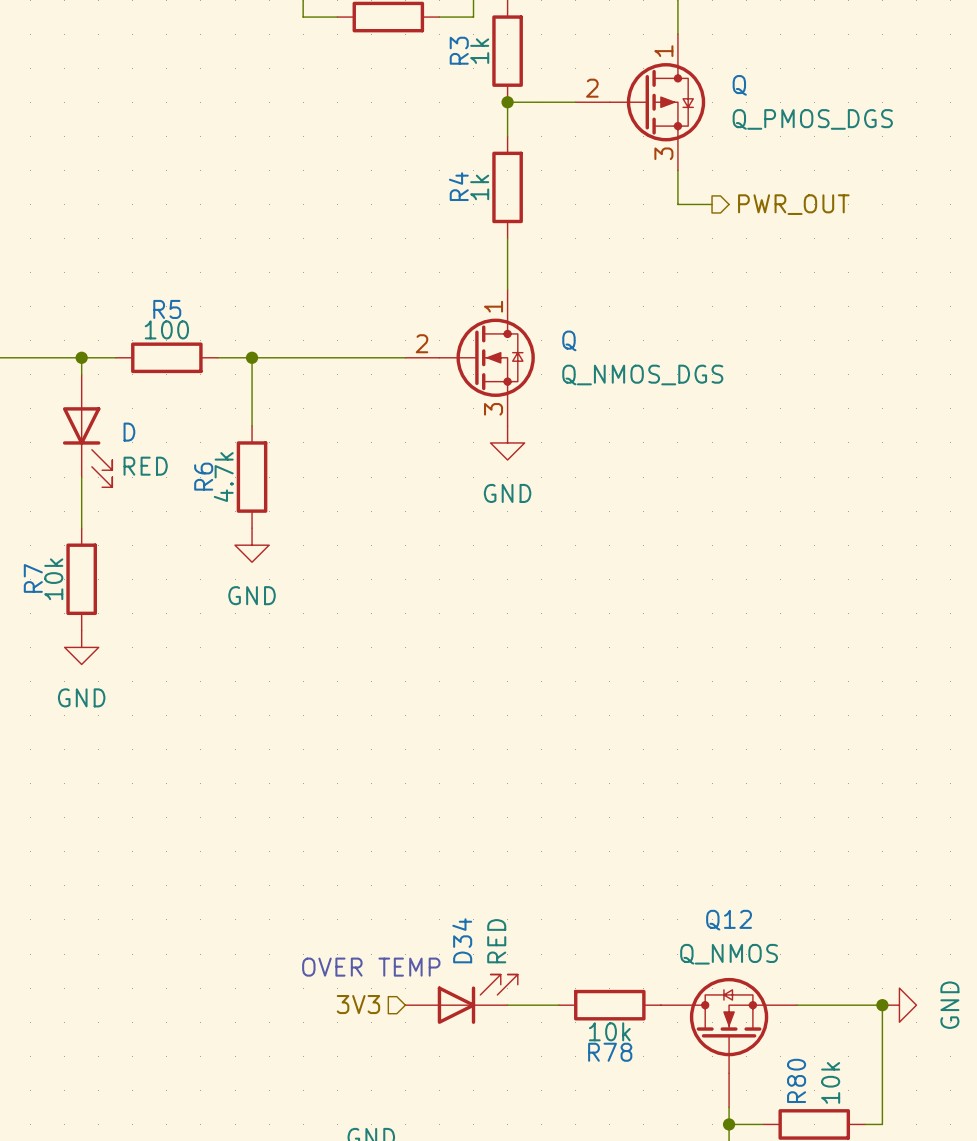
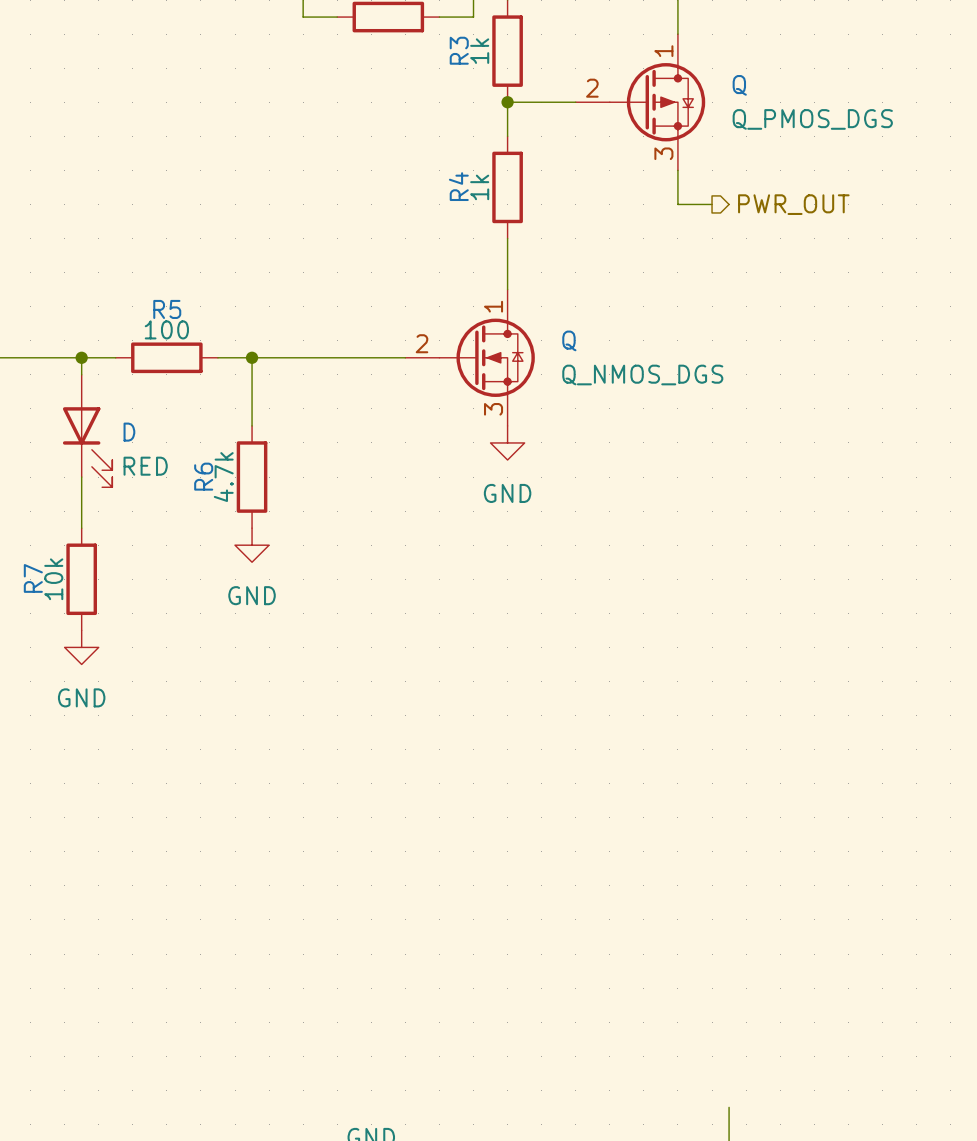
text: OVER TEMP (371, 967) -> none
D34: RED (461, 999) -> none
hierarchical label: 3V3 (358, 1004) -> none
wire: (507, 1005) (558, 1005) -> none
R78: 10k (609, 1005) -> none
wire: (797, 1005) (882, 1005) (882, 1124) (865, 1124) -> none
junction: (882, 1005) -> none
power symbol: GND (899, 1005) -> none
Q12: Q_NMOS (729, 1042) -> none
wire: (729, 1124) (763, 1124) -> none
junction: (729, 1124) -> none
R80: 10k (814, 1124) -> none

